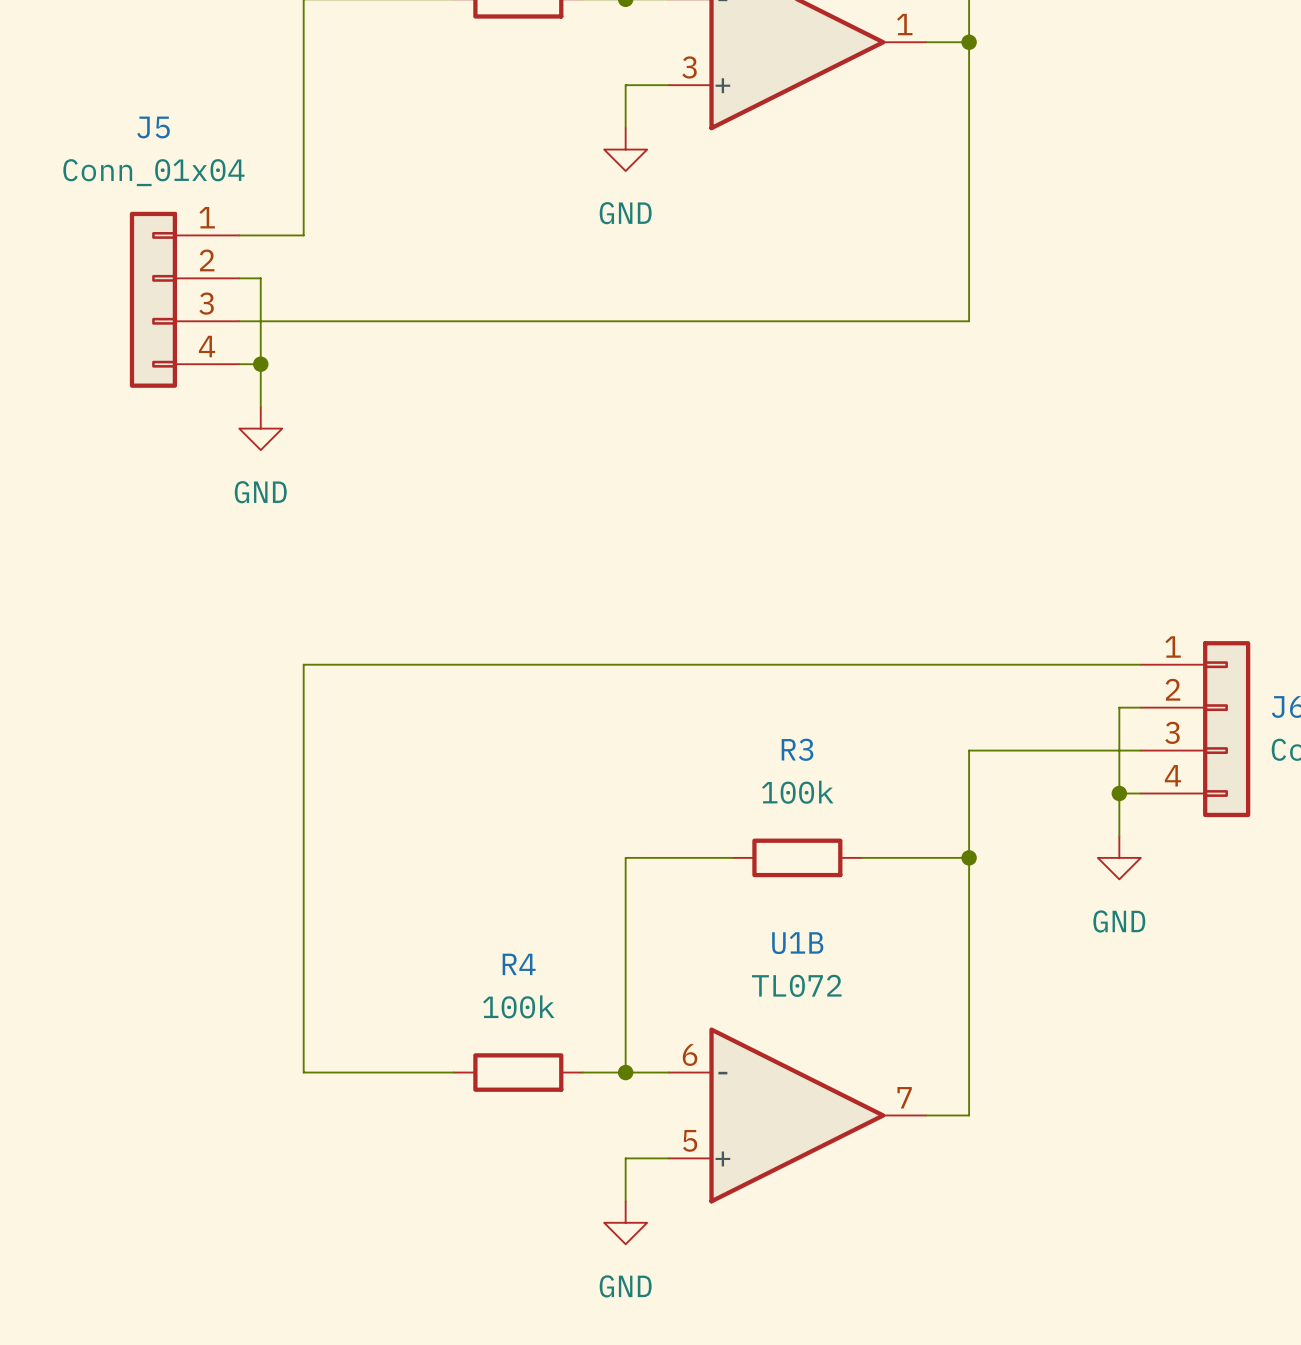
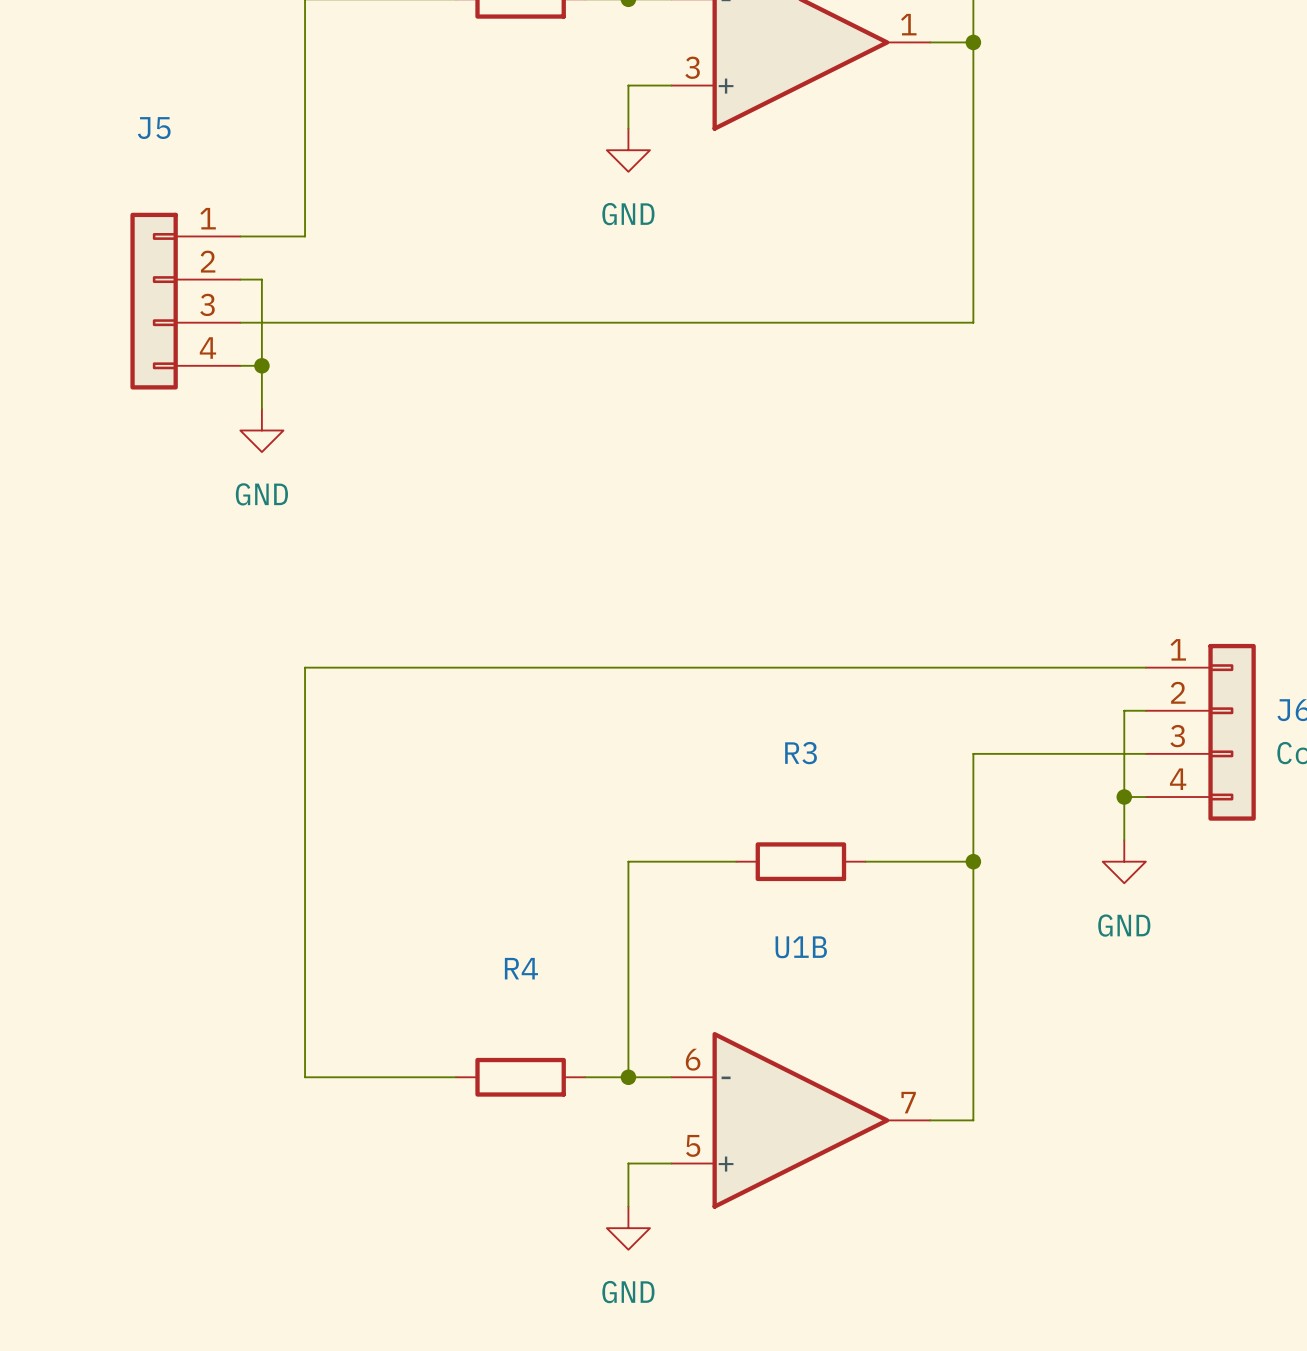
J5 value: Conn_01x04 (153, 172) -> none
R3 value: 100k (797, 792) -> none
U1B value: TL072 (796, 985) -> none
R4 value: 100k (518, 1006) -> none

